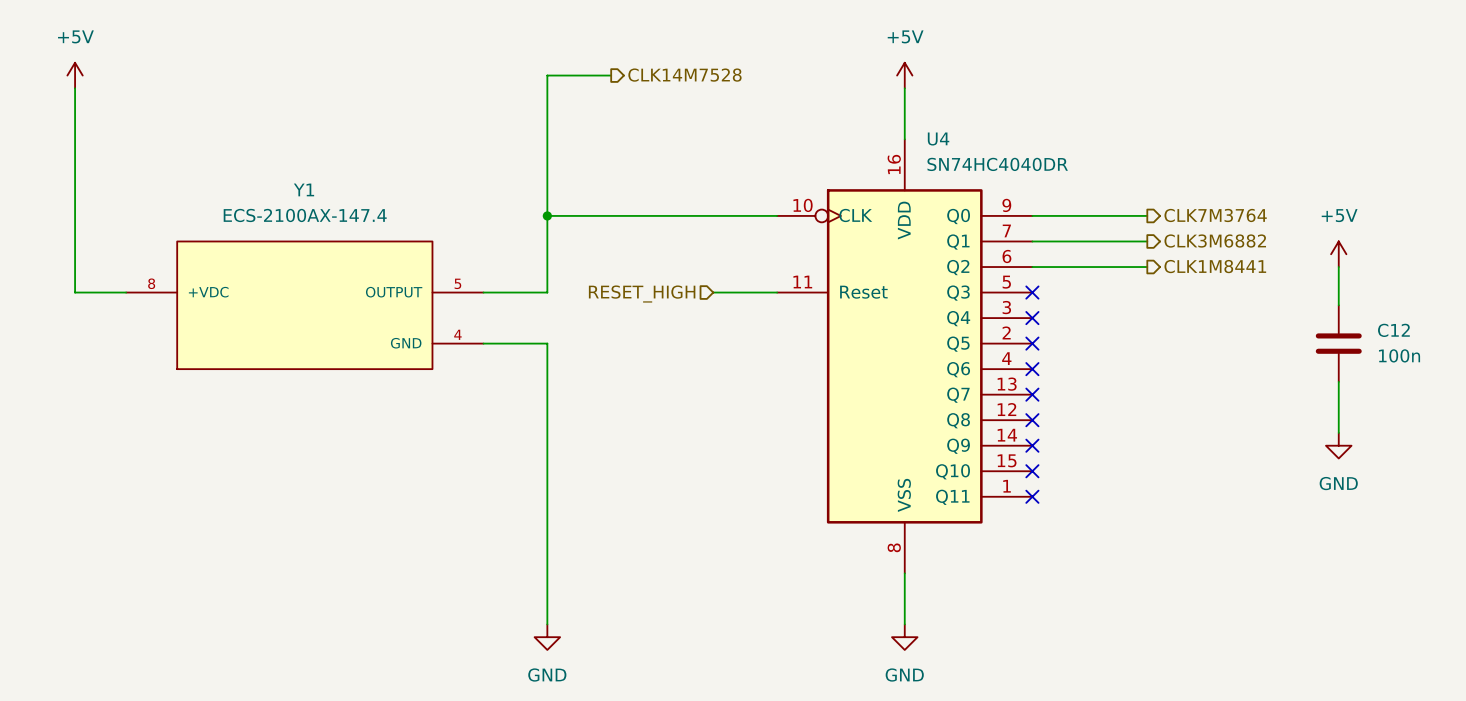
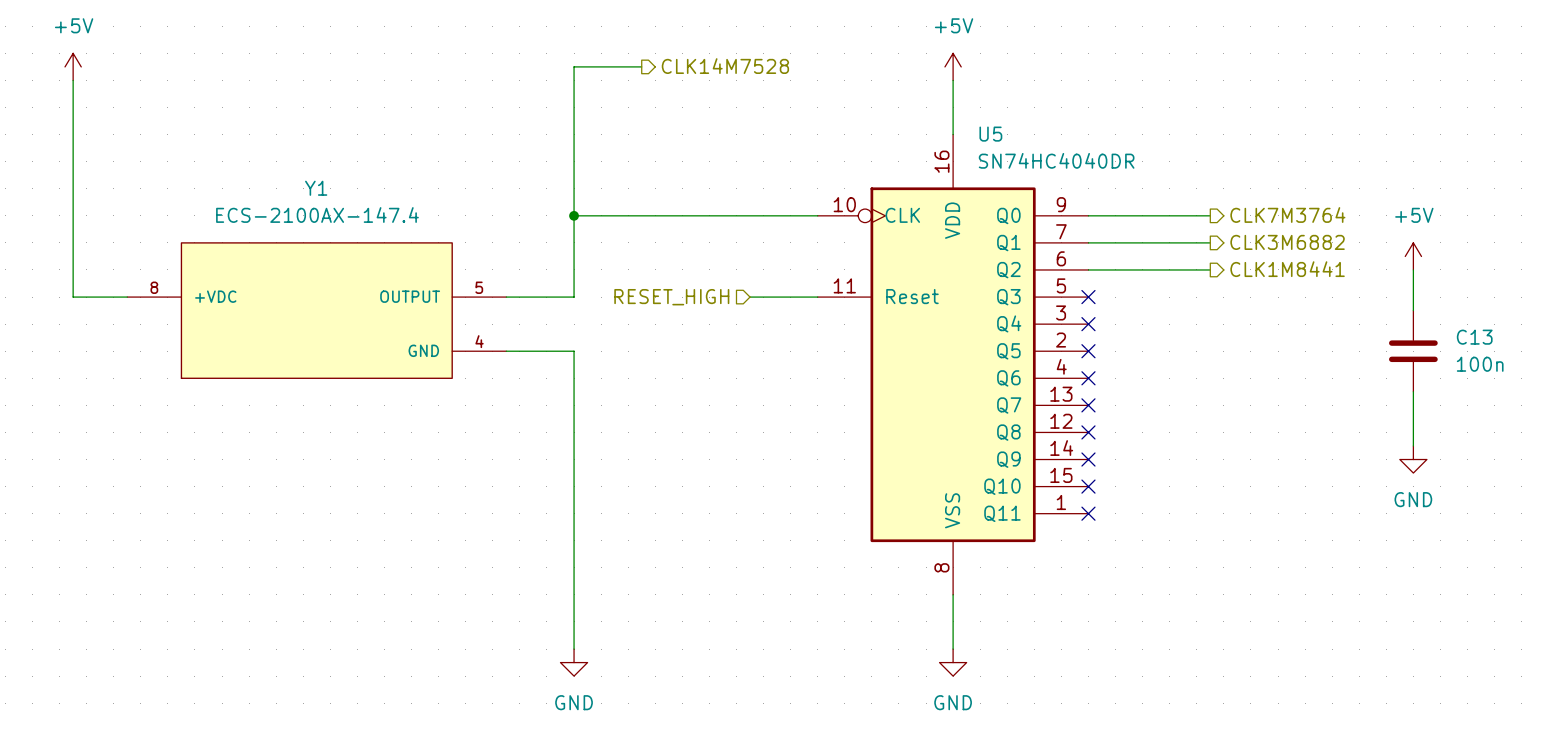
U4 name: U4 (938, 139) -> U5 (990, 134)
C12 name: C12 (1393, 330) -> C13 (1474, 337)

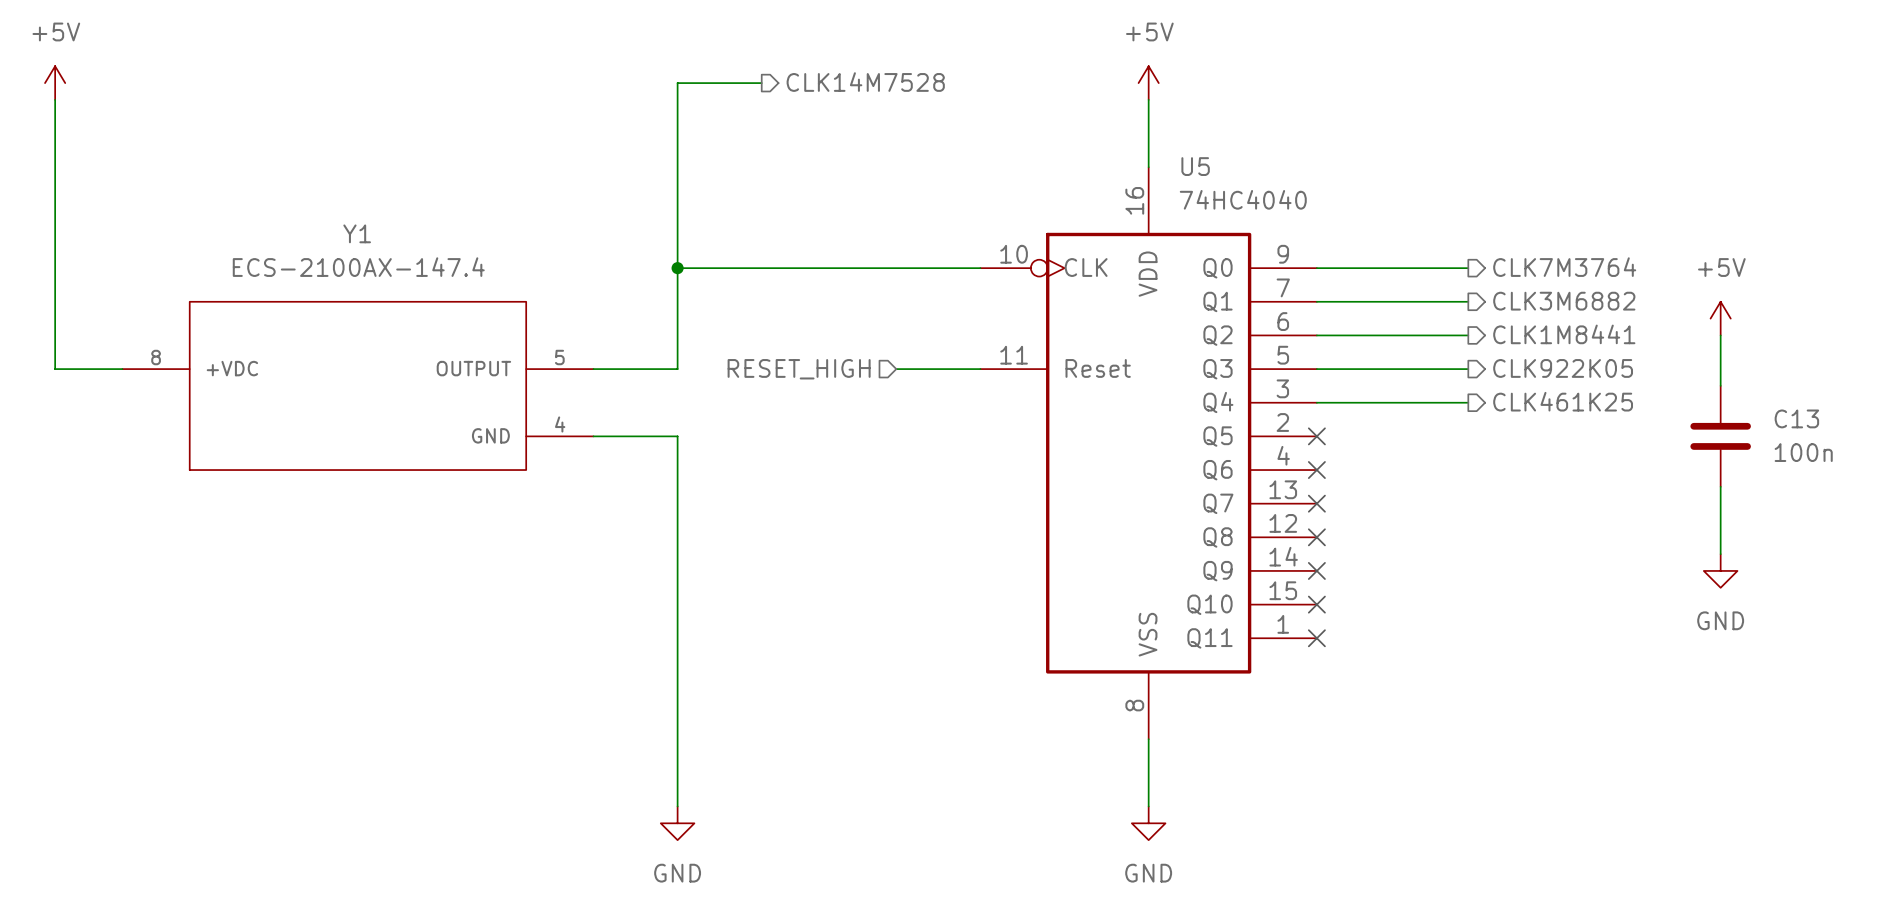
U5 value: SN74HC4040DR (1056, 160) -> 74HC4040 (1243, 199)
hierarchical label: none -> CLK922K05 (1563, 368)
wire: none -> (1316, 369) (1468, 369)
no-connect mark: (1088, 297) -> none
hierarchical label: none -> CLK461K25 (1563, 401)
wire: none -> (1316, 402) (1468, 402)
no-connect mark: (1088, 324) -> none

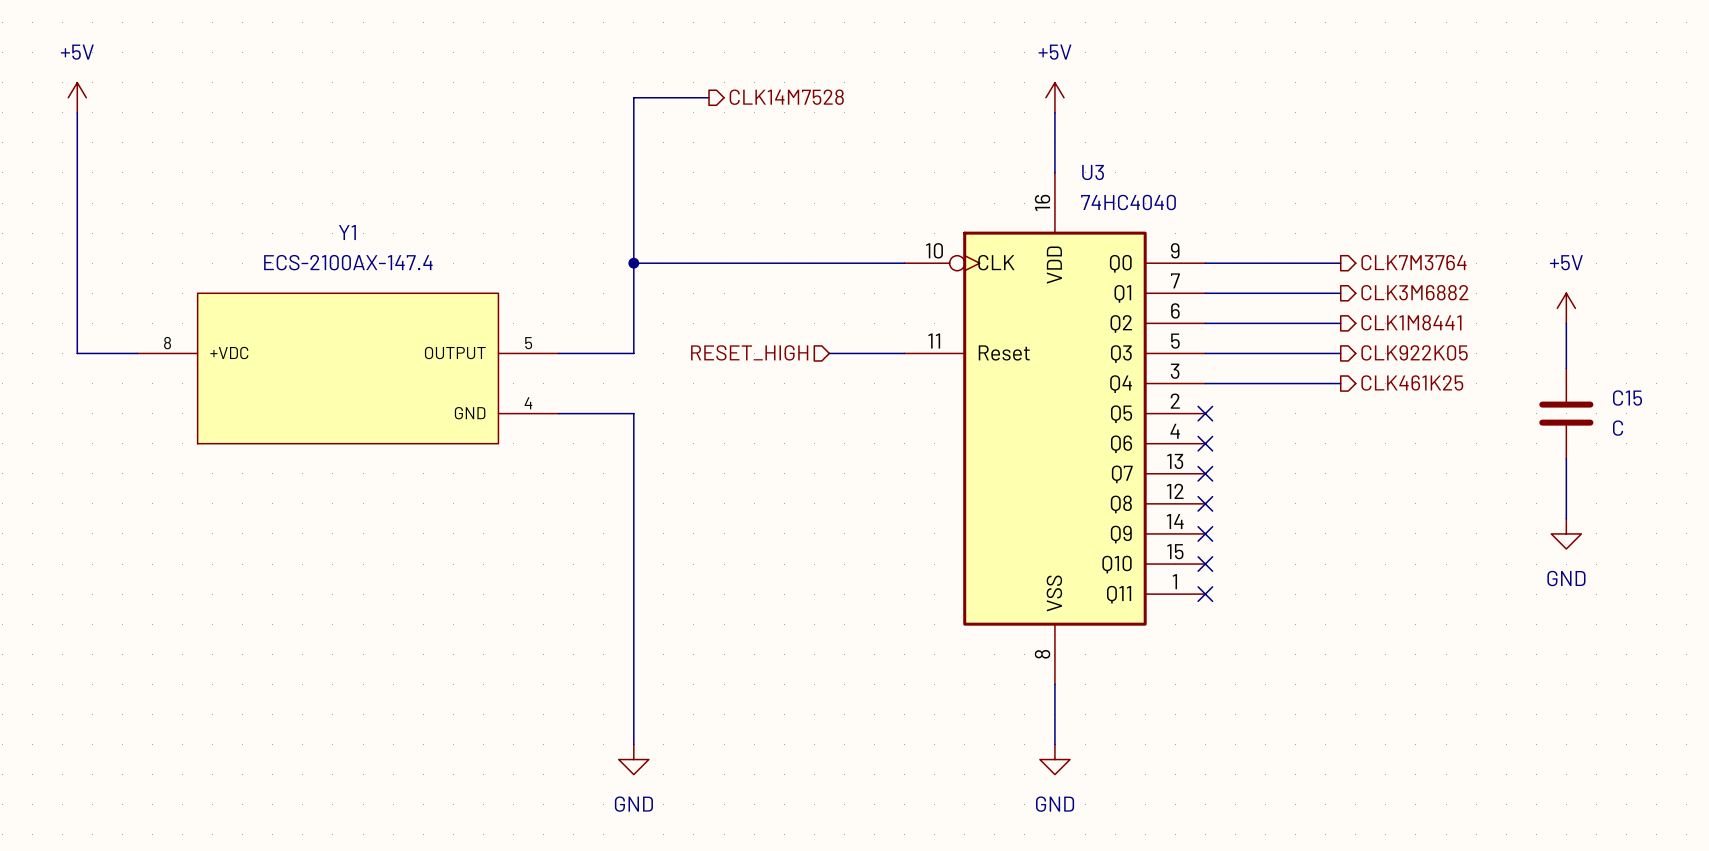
U5 name: U5 (1195, 166) -> U3 (1093, 172)
C13 name: C13 (1796, 418) -> C15 (1627, 398)
C13 value: 100n (1803, 452) -> C (1618, 428)

